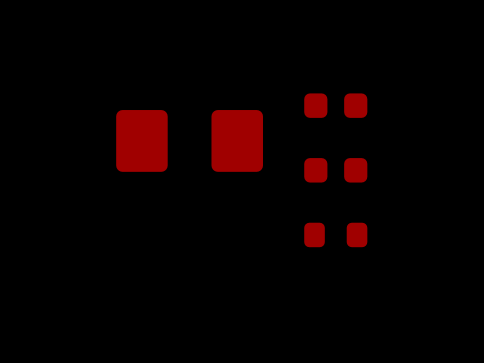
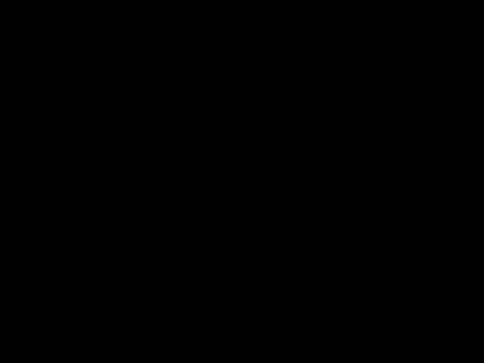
part: (335, 105) -> none
part: (189, 140) -> none
part: (335, 170) -> none
part: (335, 234) -> none

